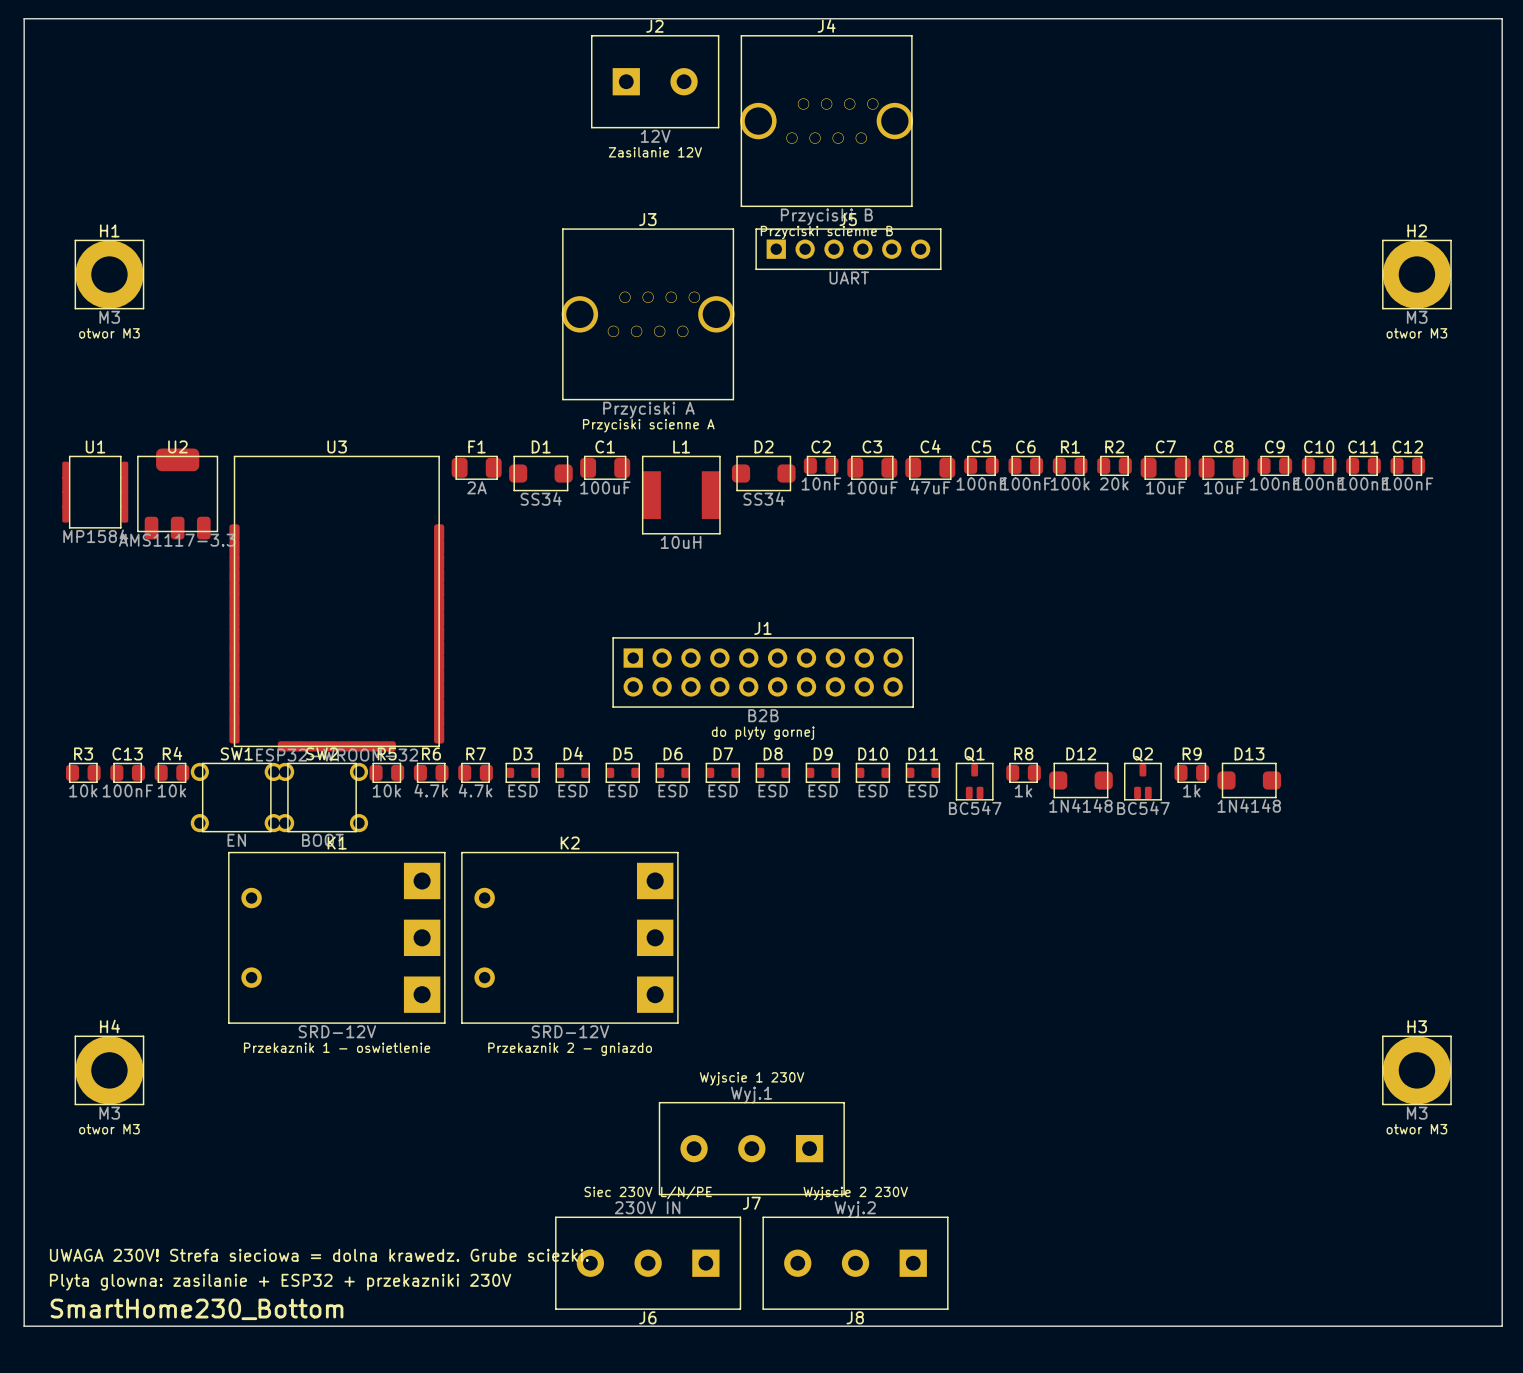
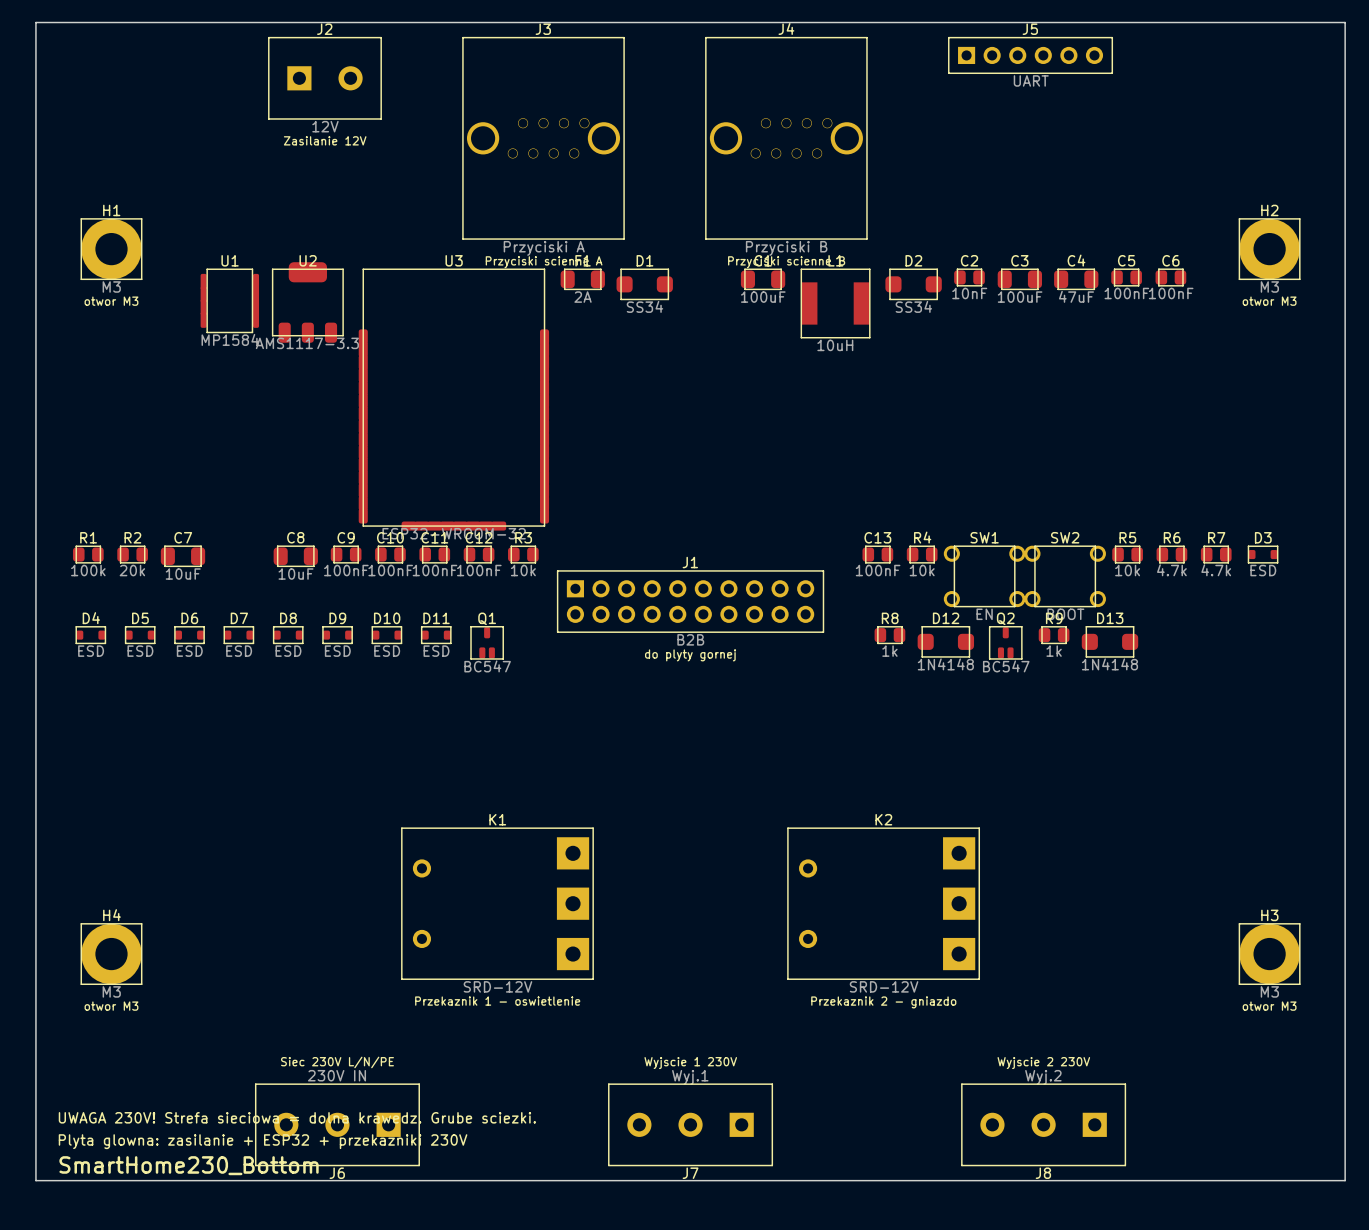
J4 name position: J4 (826, 25) -> J4 (786, 28)
J4 footprint: [740, 35, 914, 208] -> [705, 37, 868, 240]
J2 position: (655, 81) -> (324, 78)
J4 value position: Przyciski B (826, 216) -> Przyciski B (786, 248)
J3 name position: J3 (647, 219) -> J3 (543, 29)
J3 footprint: [561, 228, 735, 401] -> [462, 37, 625, 240]
J5 position: (848, 249) -> (1030, 55)
J3 value position: Przyciski A (648, 410) -> Przyciski A (544, 248)
C2 position: (821, 465) -> (969, 277)
C5 position: (981, 465) -> (1126, 277)
C6 position: (1025, 465) -> (1170, 277)
R1 position: (1070, 465) -> (88, 554)
R2 position: (1114, 465) -> (132, 554)
C9 position: (1274, 465) -> (346, 554)
C10 position: (1319, 465) -> (390, 554)
C11 position: (1363, 465) -> (434, 554)
C12 position: (1407, 465) -> (479, 554)
F1 position: (476, 467) -> (582, 279)
C1 position: (605, 467) -> (763, 279)
C3 position: (872, 467) -> (1019, 279)
C4 position: (930, 467) -> (1076, 279)
C7 position: (1165, 467) -> (182, 556)
C8 position: (1223, 467) -> (295, 556)
D1 position: (540, 473) -> (644, 284)
D2 position: (763, 473) -> (913, 284)
U1 position: (95, 492) -> (229, 300)
U2 position: (177, 493) -> (307, 302)
L1 position: (681, 495) -> (835, 303)
U3 position: (336, 603) -> (453, 399)
R3 position: (83, 772) -> (523, 554)
C13 position: (127, 772) -> (877, 554)
R4 position: (171, 772) -> (922, 554)
R5 position: (386, 772) -> (1127, 554)
R6 position: (431, 772) -> (1171, 554)
R7 position: (475, 772) -> (1216, 554)
D3 position: (522, 772) -> (1263, 554)
D4 position: (572, 772) -> (90, 635)
D5 position: (622, 772) -> (140, 635)
D6 position: (672, 772) -> (189, 635)
D7 position: (722, 772) -> (238, 635)
D8 position: (772, 772) -> (288, 635)
D9 position: (822, 772) -> (337, 635)
D10 position: (872, 772) -> (386, 635)
D11 position: (922, 772) -> (436, 635)
R8 position: (1023, 772) -> (889, 635)
R9 position: (1191, 772) -> (1054, 635)
D12 position: (1080, 780) -> (945, 641)
D13 position: (1249, 780) -> (1109, 641)
Q1 position: (974, 781) -> (487, 642)
Q2 position: (1142, 781) -> (1005, 642)
SW1 position: (236, 797) -> (984, 576)
SW2 position: (322, 797) -> (1065, 576)
K1 position: (336, 937) -> (497, 903)
K2 position: (569, 937) -> (883, 903)
J7 position: (751, 1148) -> (690, 1124)
J6 position: (648, 1263) -> (337, 1124)
J8 position: (855, 1263) -> (1043, 1124)

